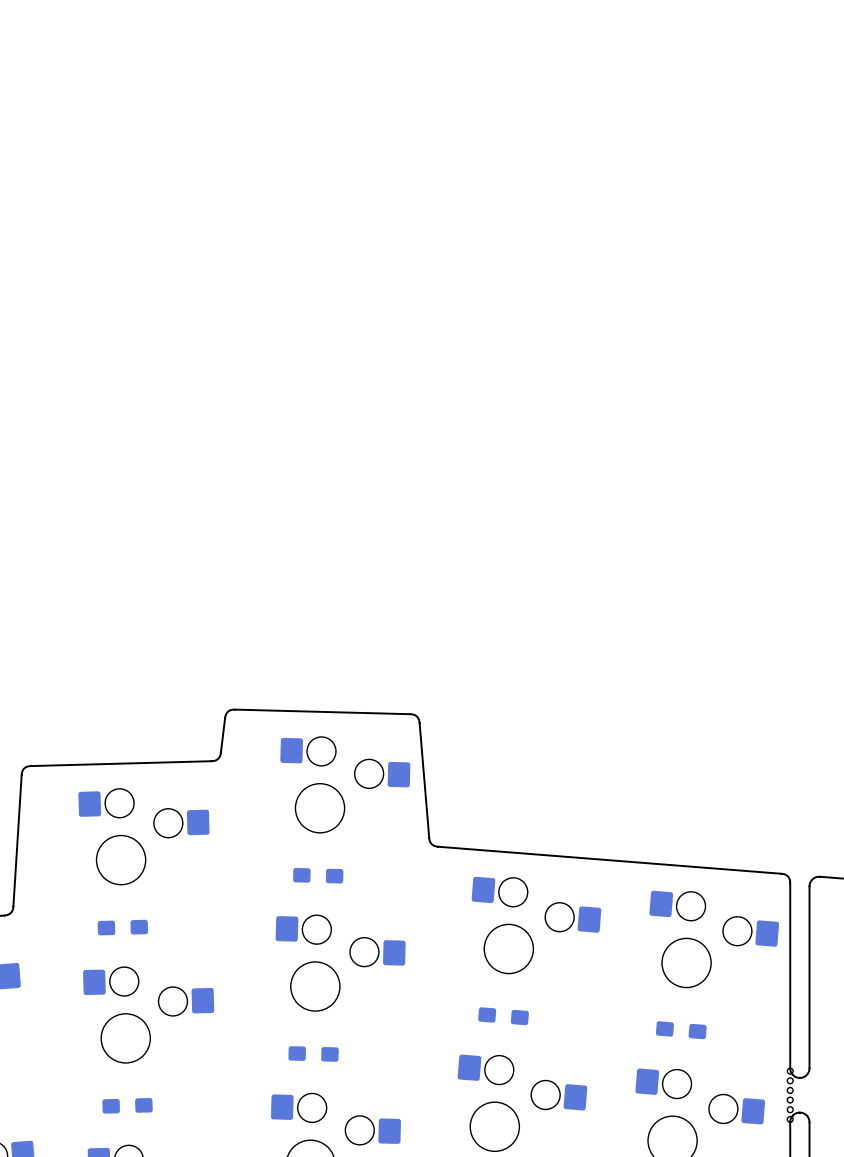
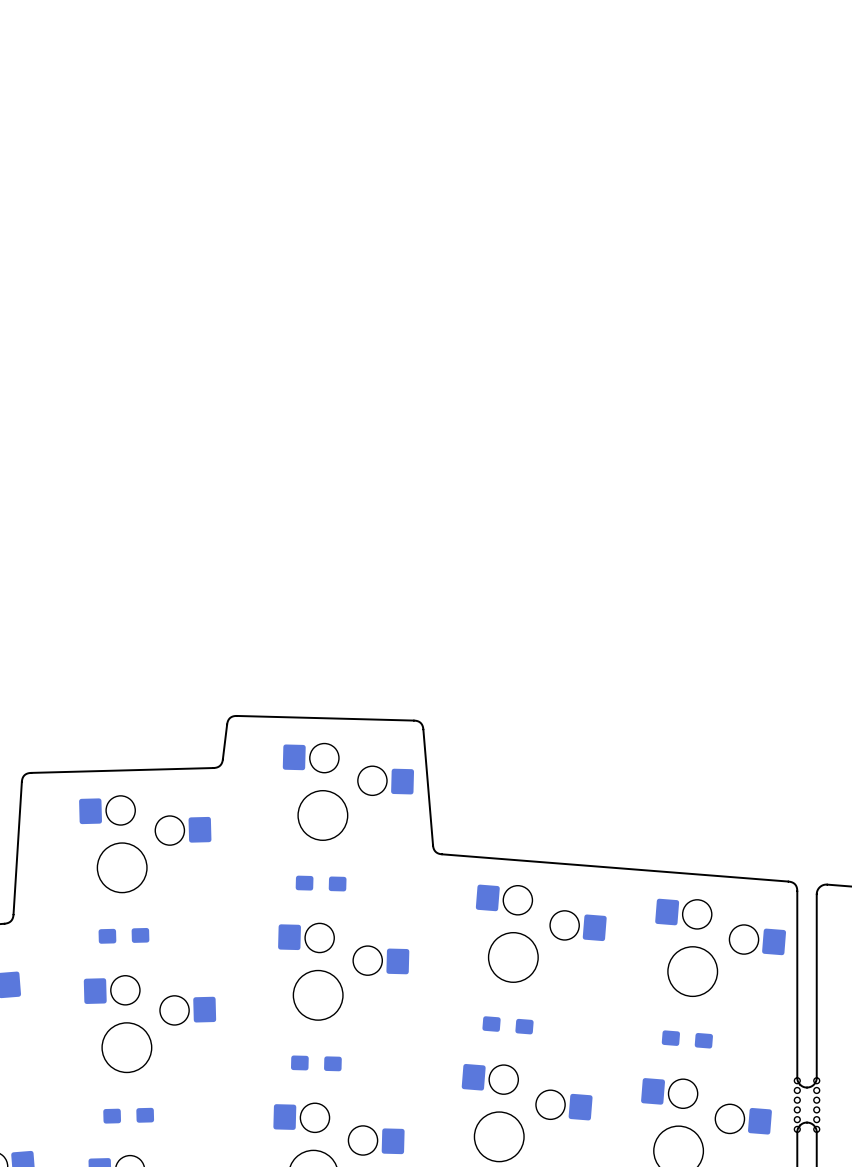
part: none -> (816, 1105)

